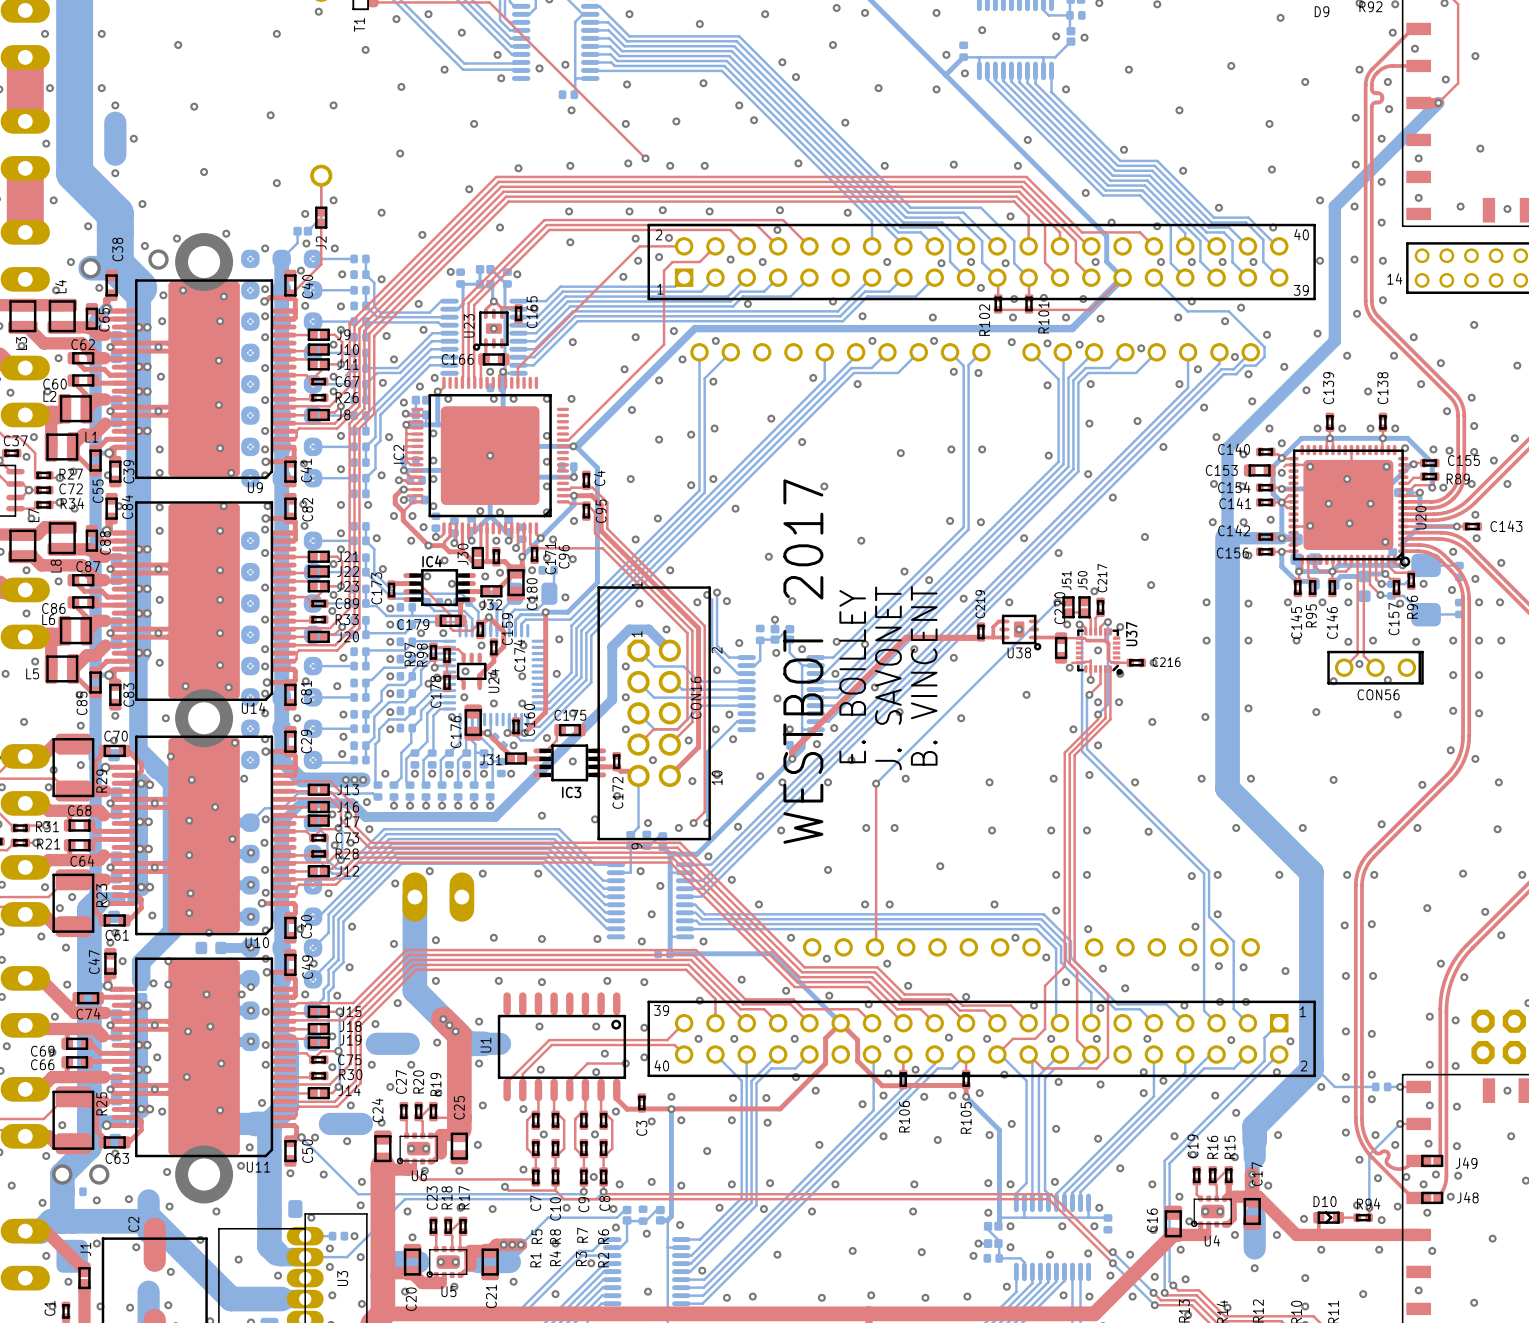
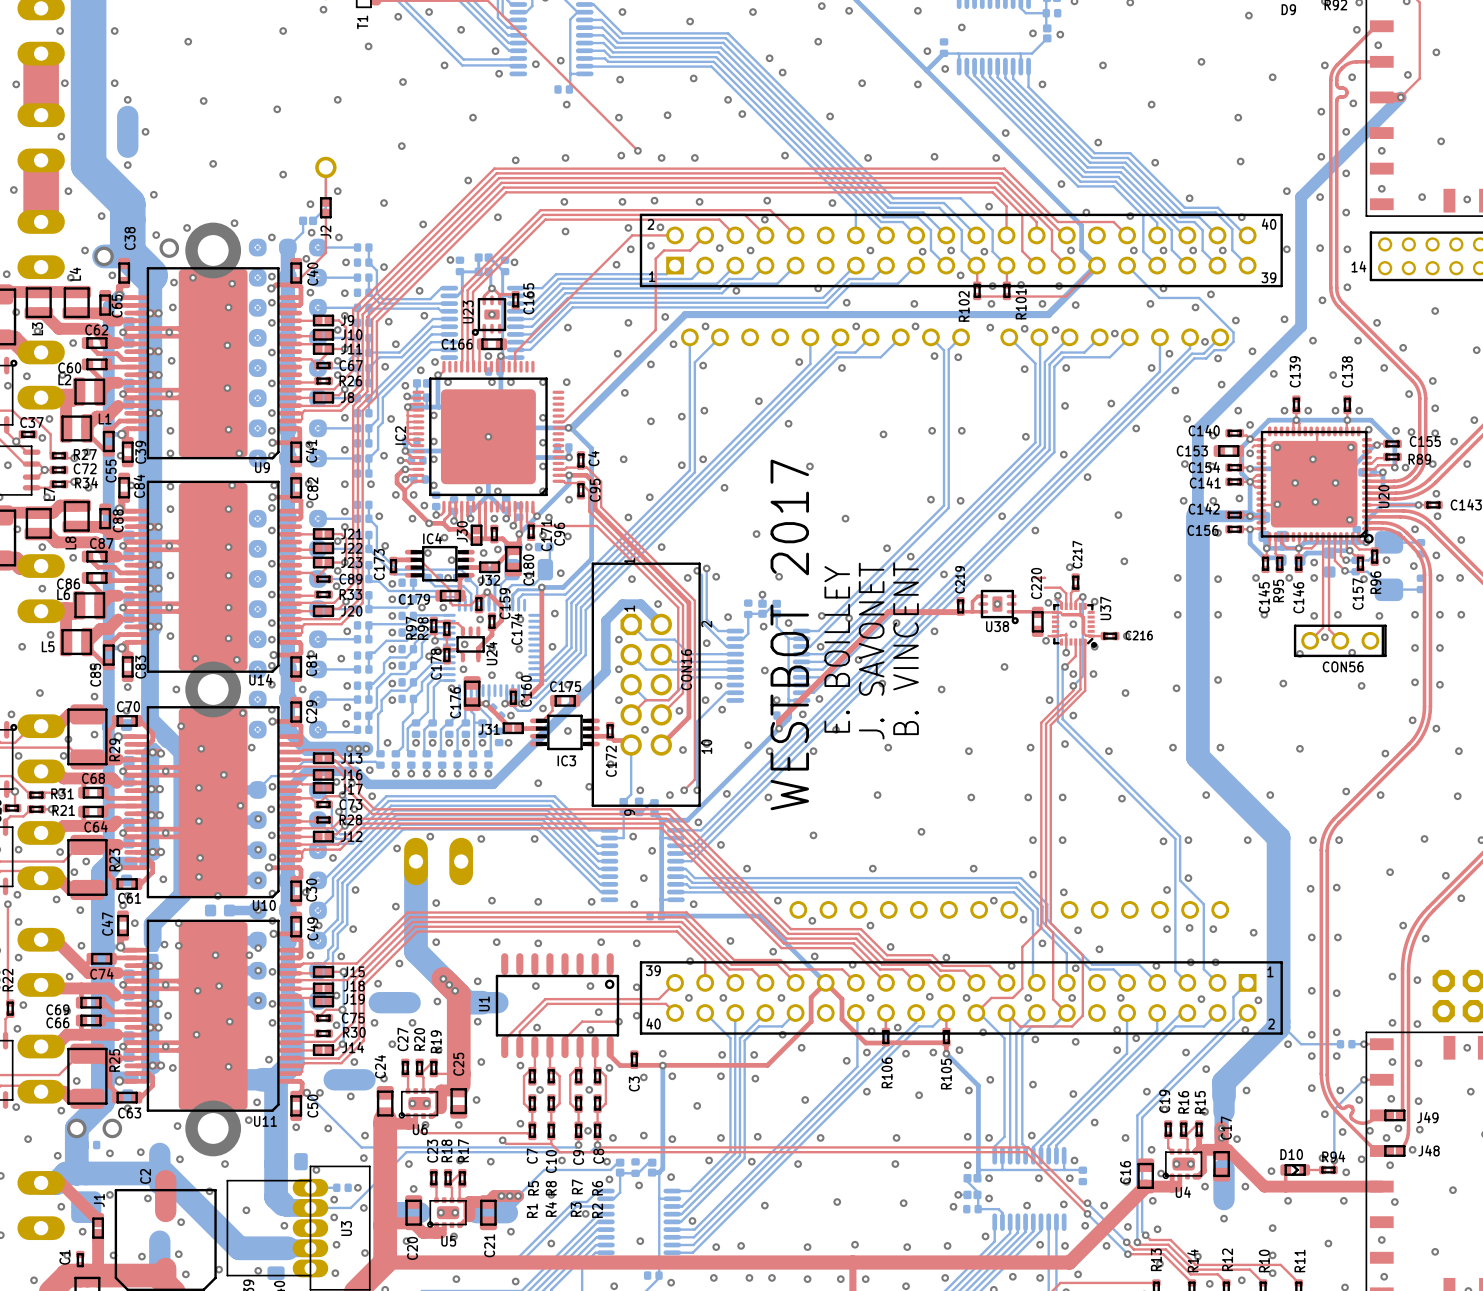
bottom track: (1057, 602) (876, 783) -> none
via: (1057, 602) -> none
J51: (1068, 607) -> none
J50: (1084, 607) -> none
via: none -> (1057, 595)
via: (1067, 624) -> none
via: (1079, 624) -> none
via: none -> (1048, 602)
top track: (876, 783) (874, 947) -> none
via: (876, 783) -> none
via: (866, 828) -> none
via: (865, 904) -> none

